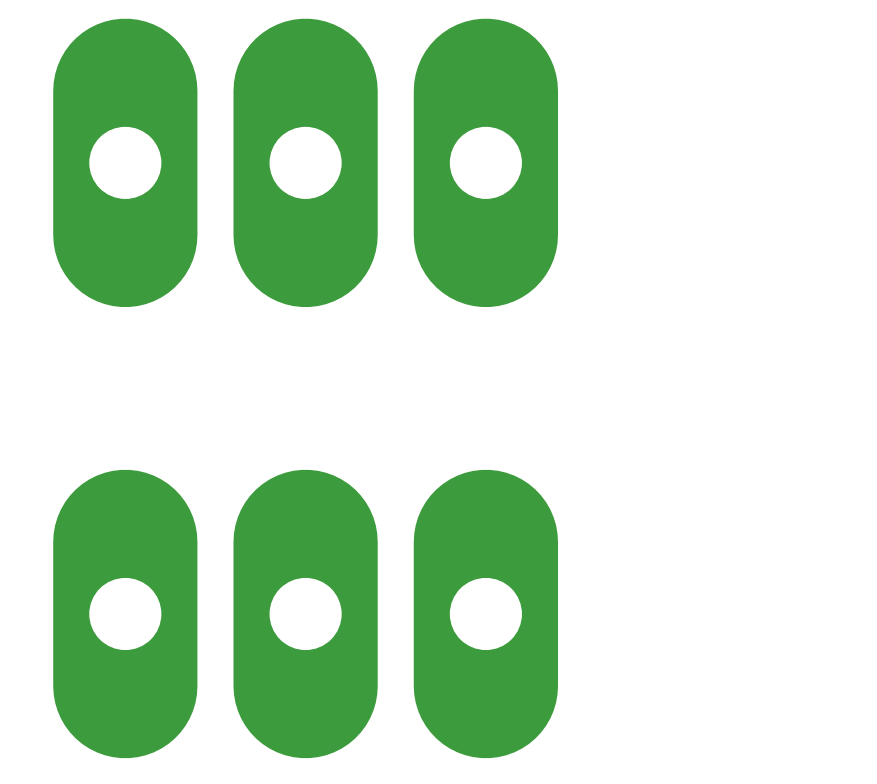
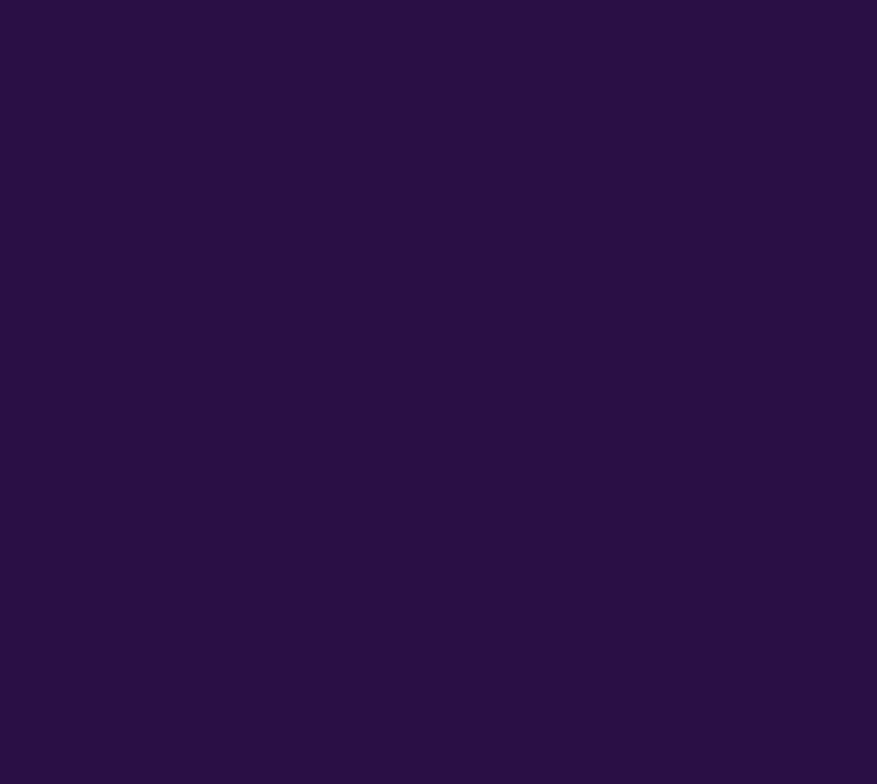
part: (305, 162) -> none
part: (305, 613) -> none

